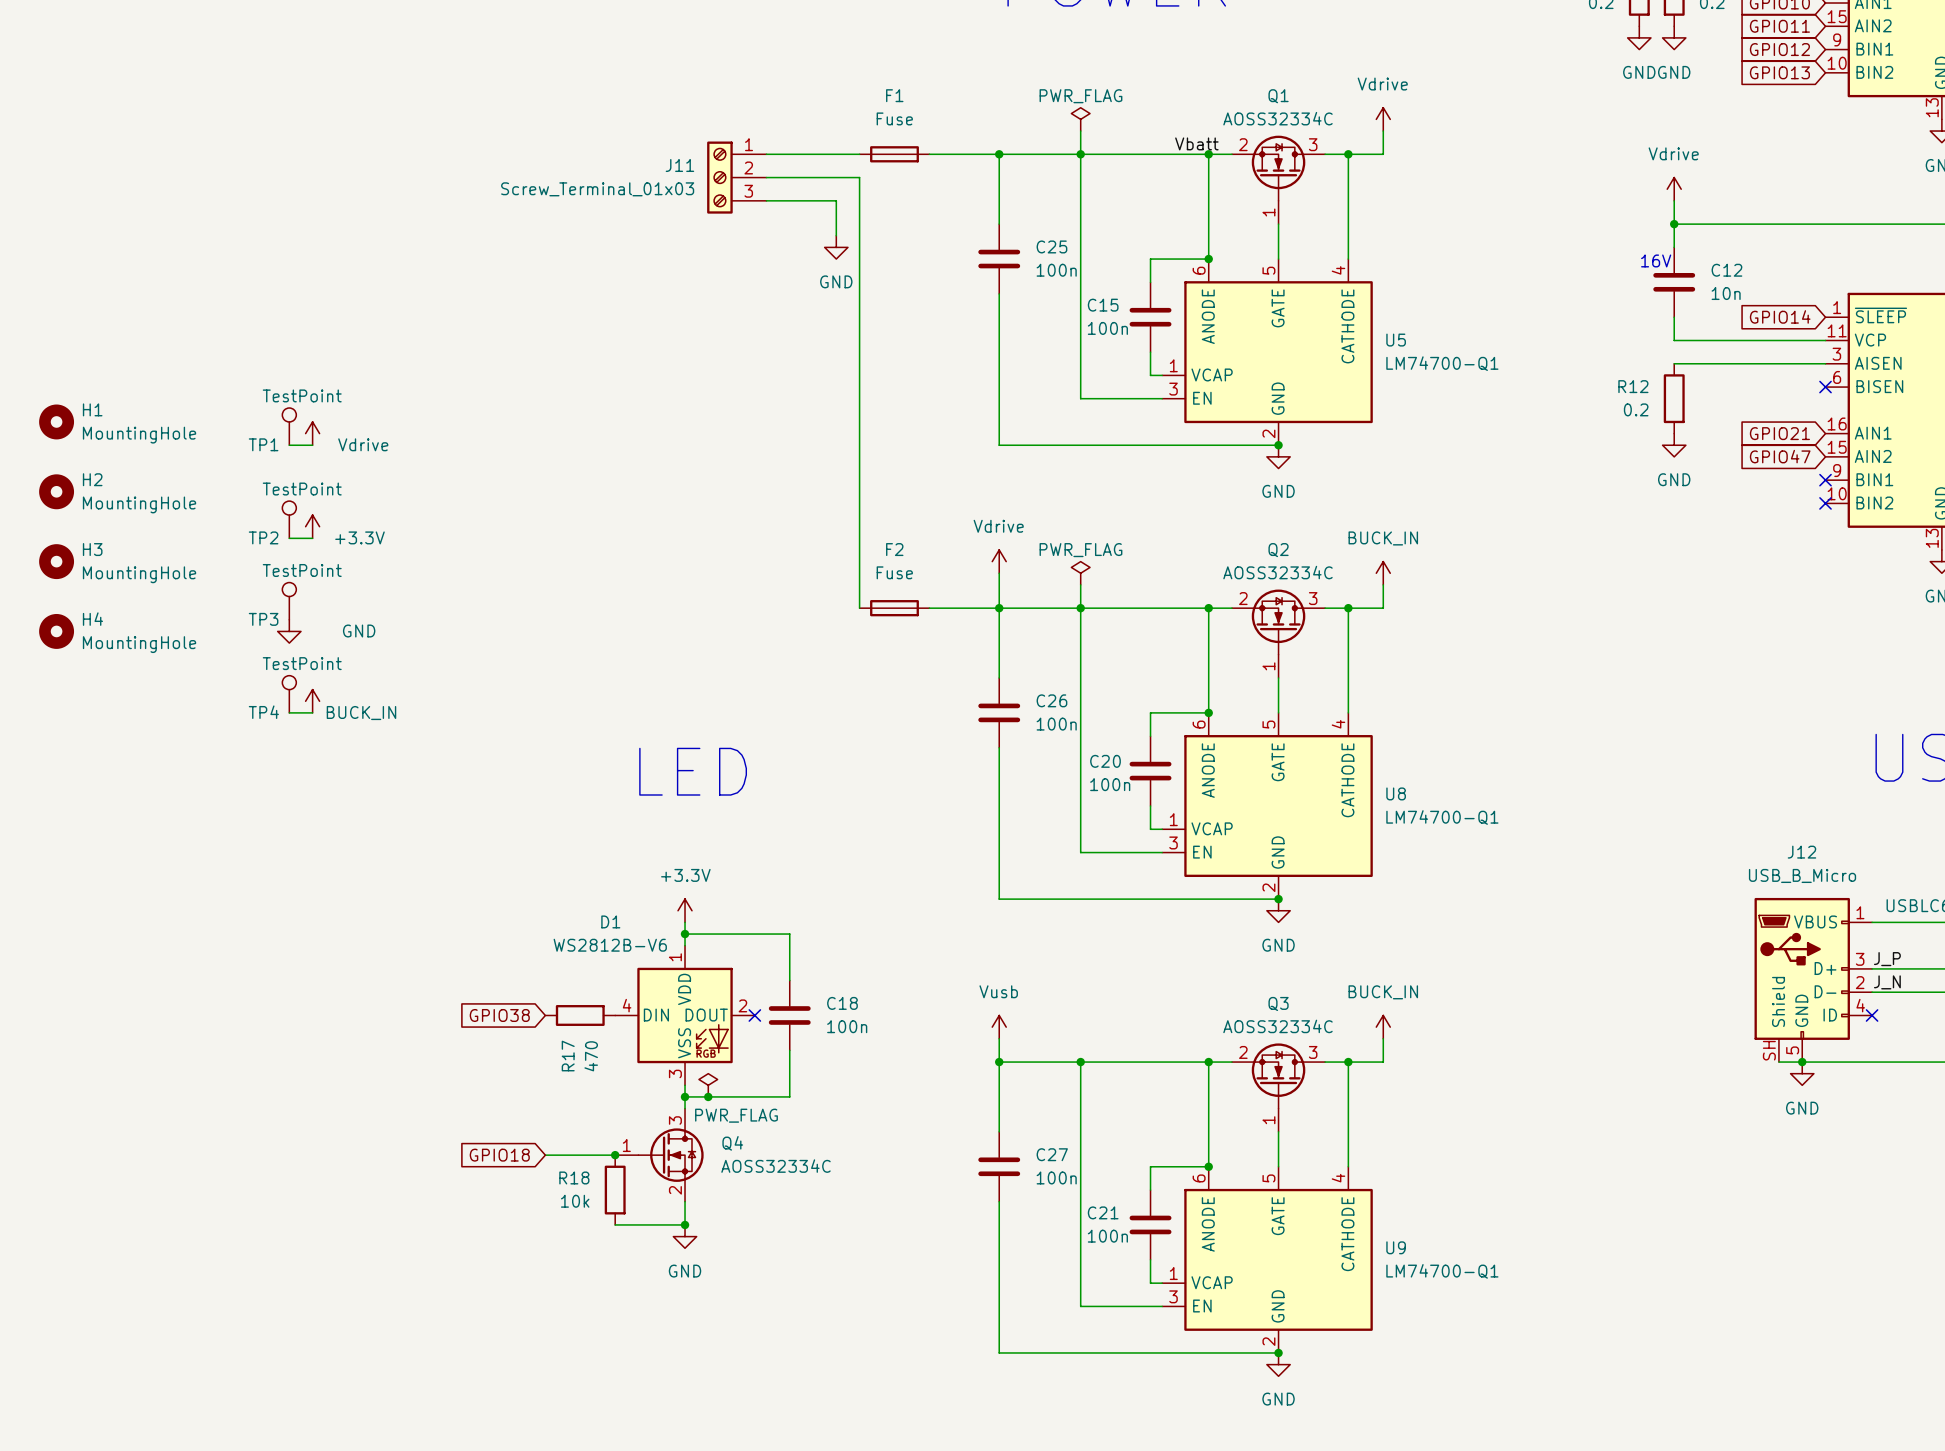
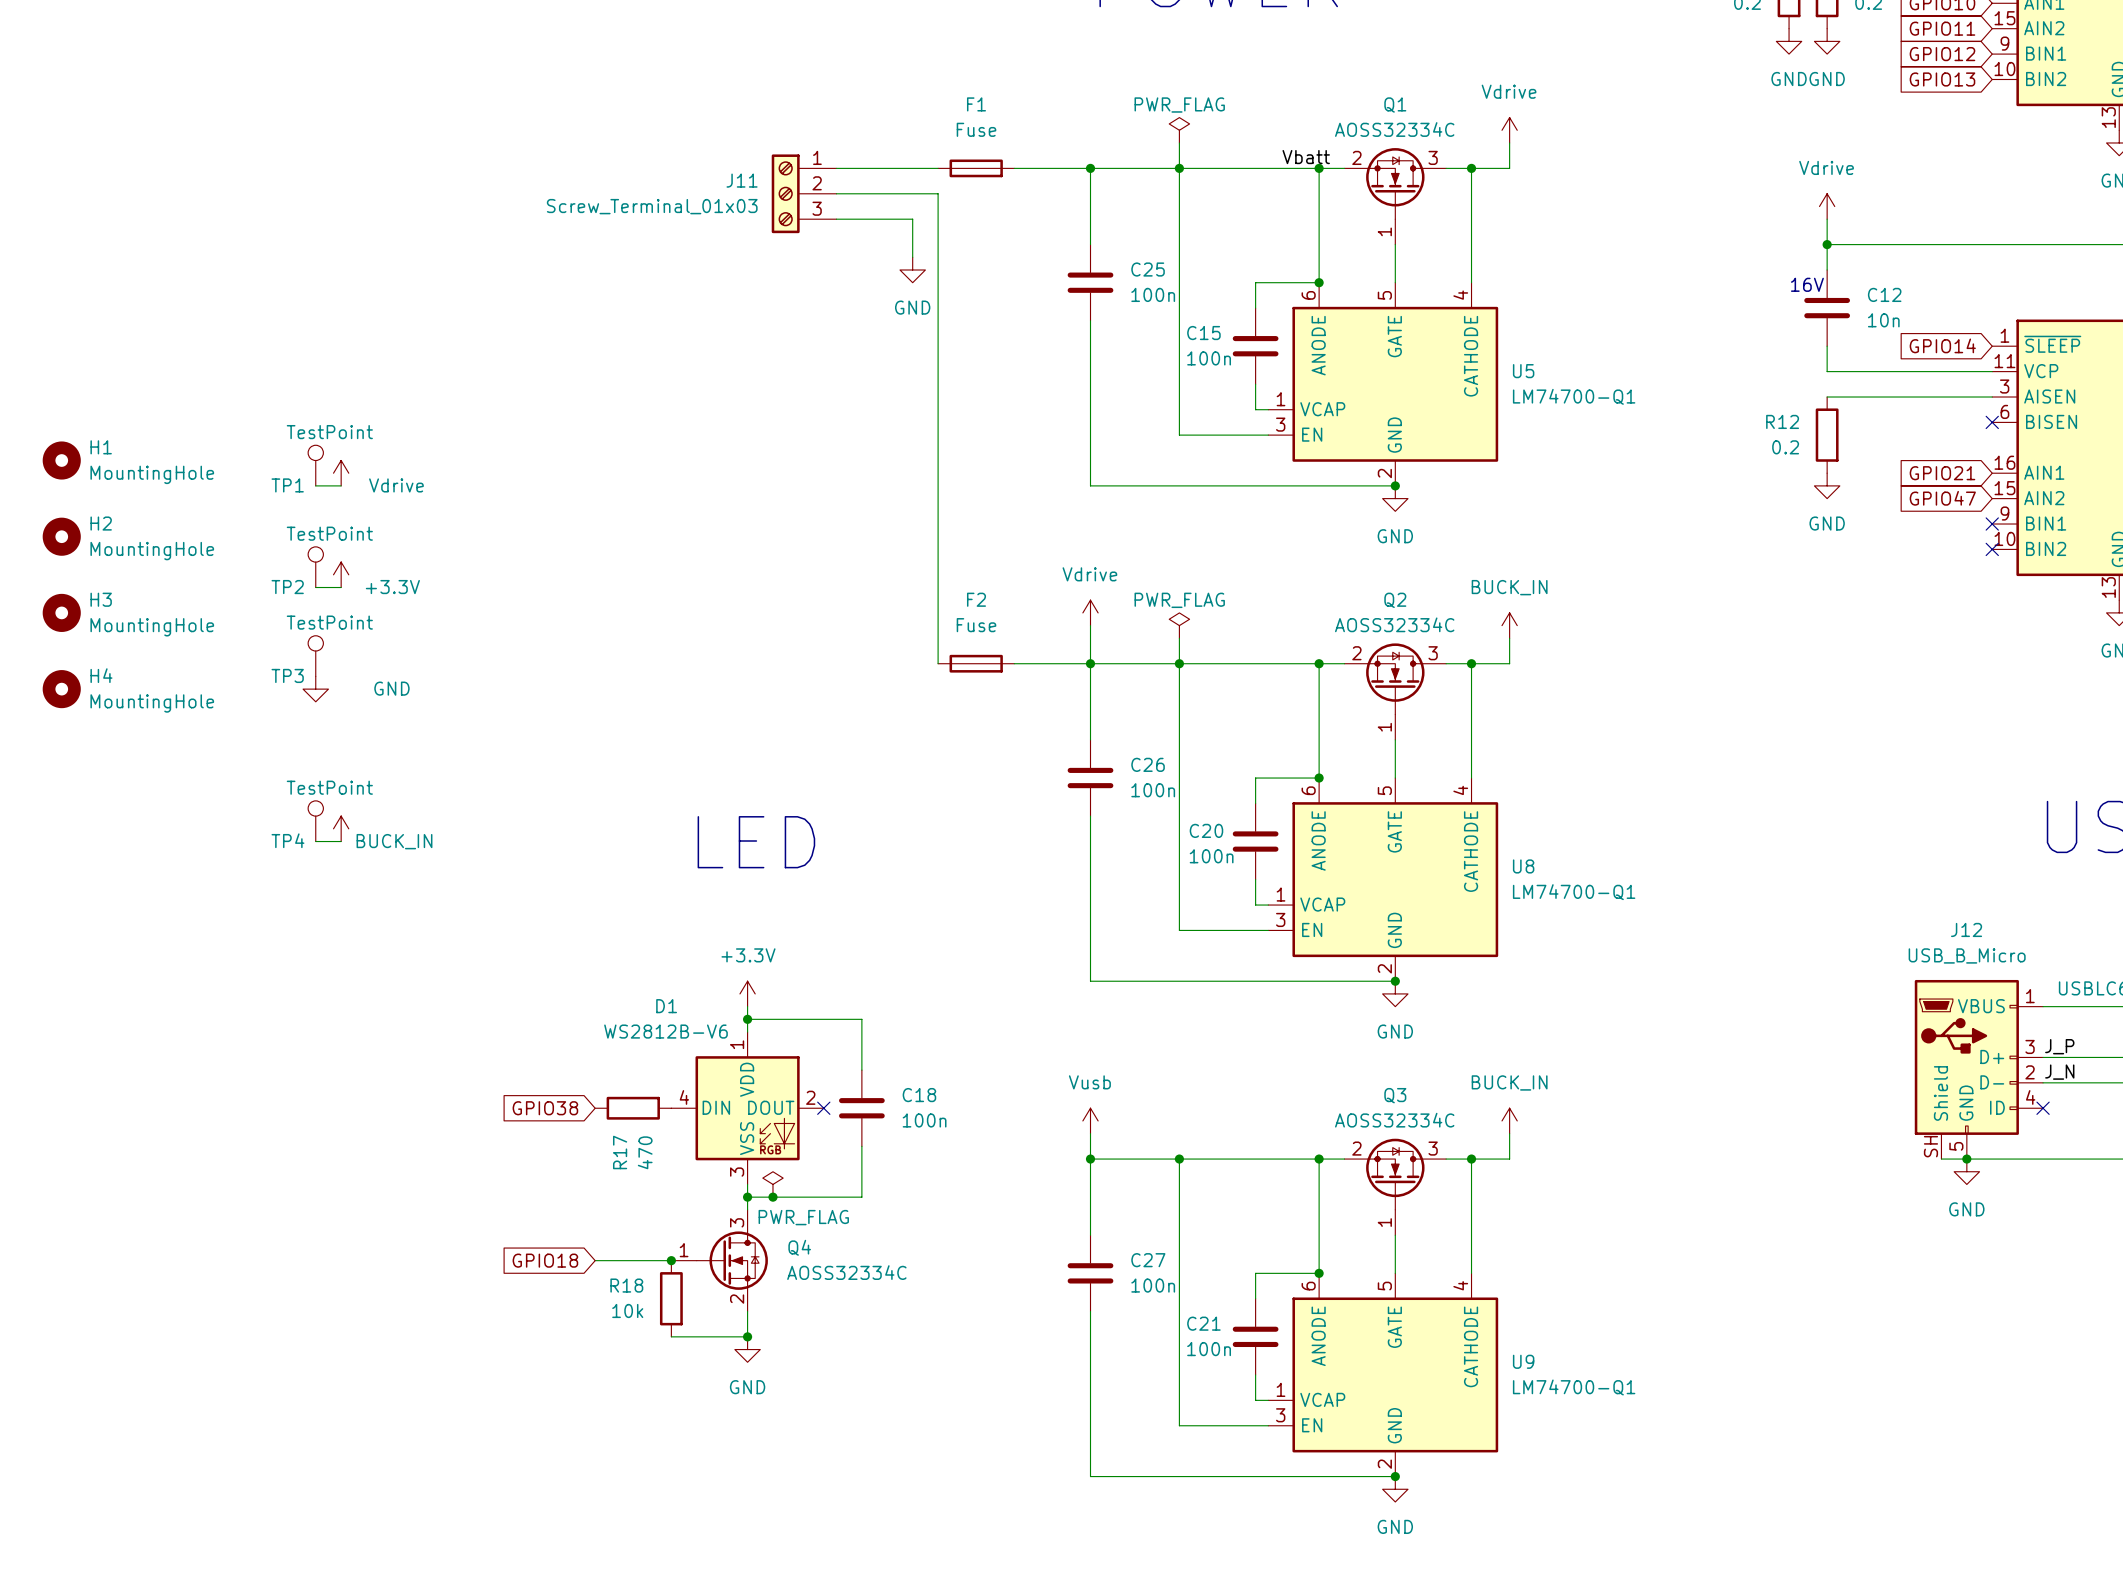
TP4 position: (289, 694) -> (315, 821)
power symbol position: BUCK_IN (312, 701) -> BUCK_IN (341, 828)
wire: (289, 712) (312, 712) -> (315, 841) (341, 841)

